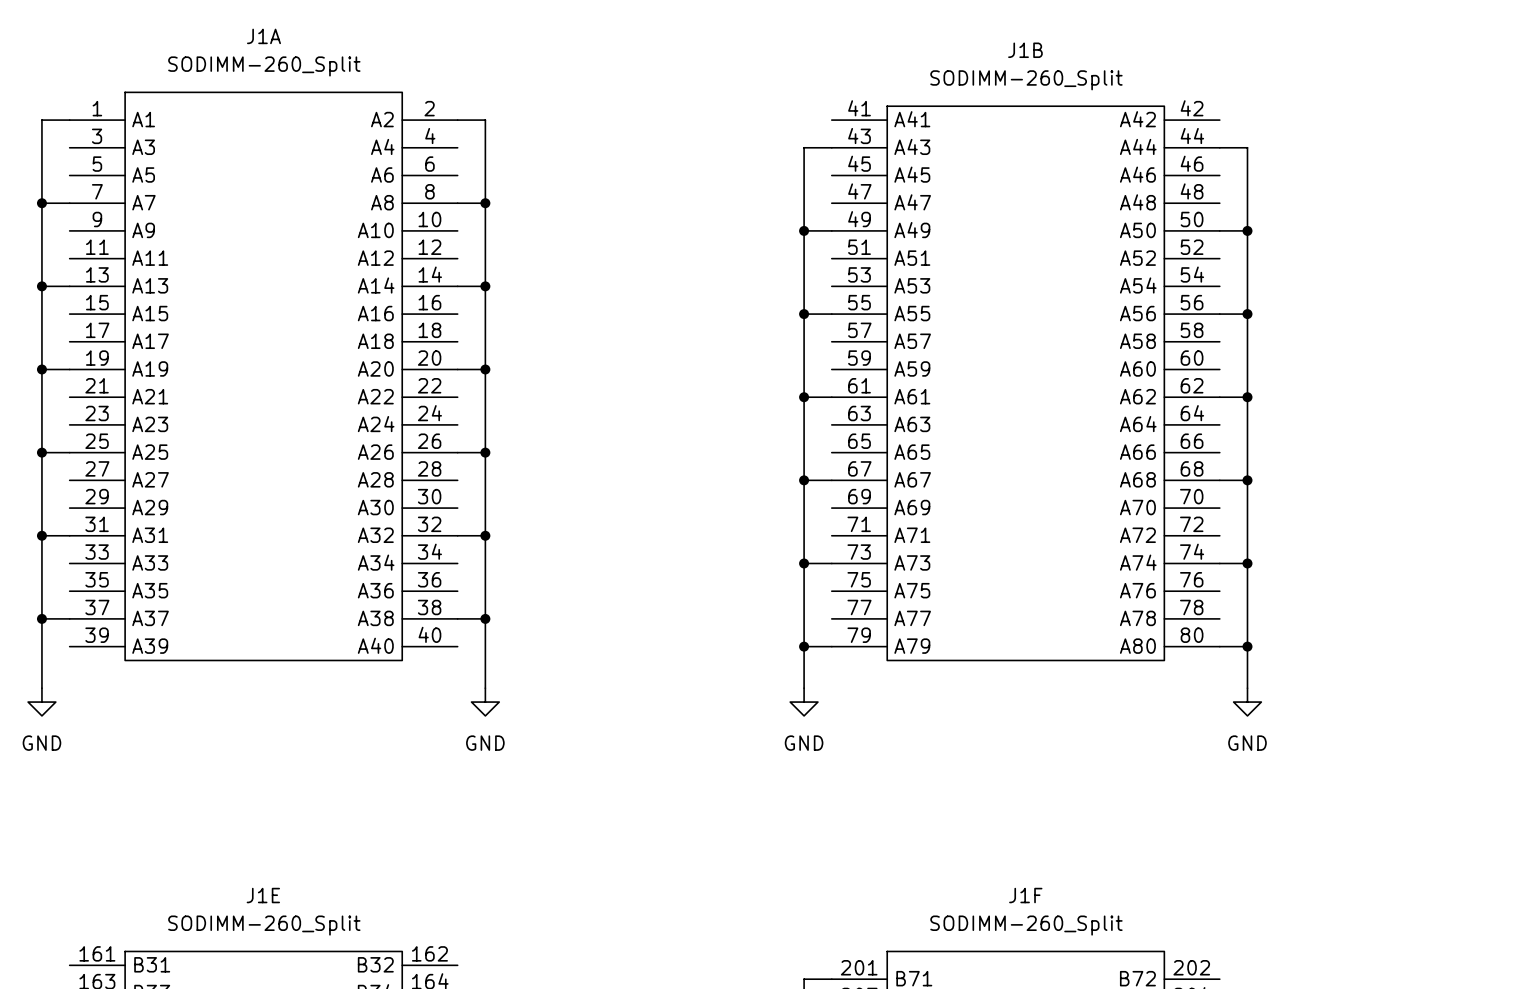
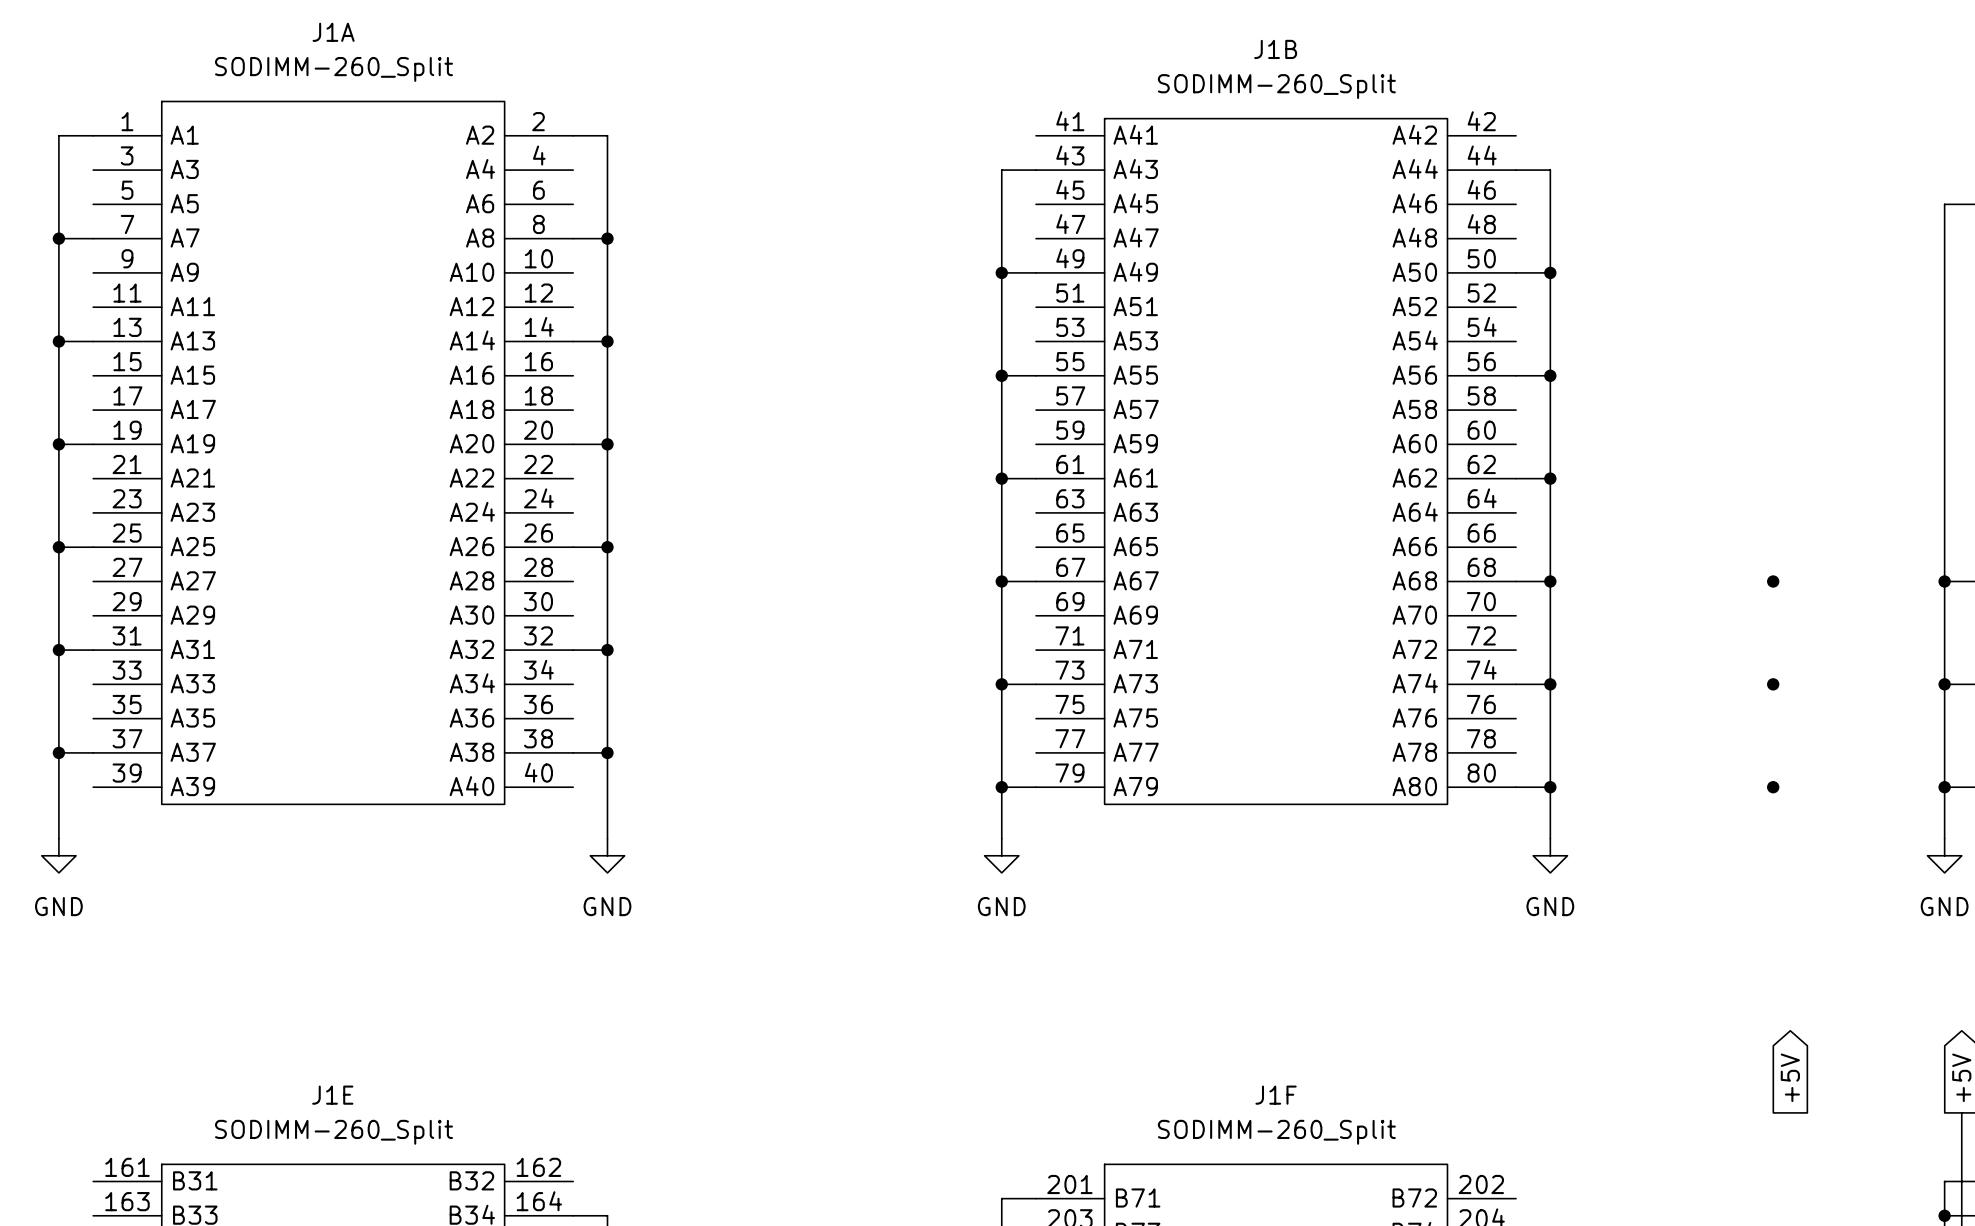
junction: none -> (1773, 581)
junction: none -> (1773, 684)
junction: none -> (1773, 787)
global label: none -> +5V (1790, 1077)

